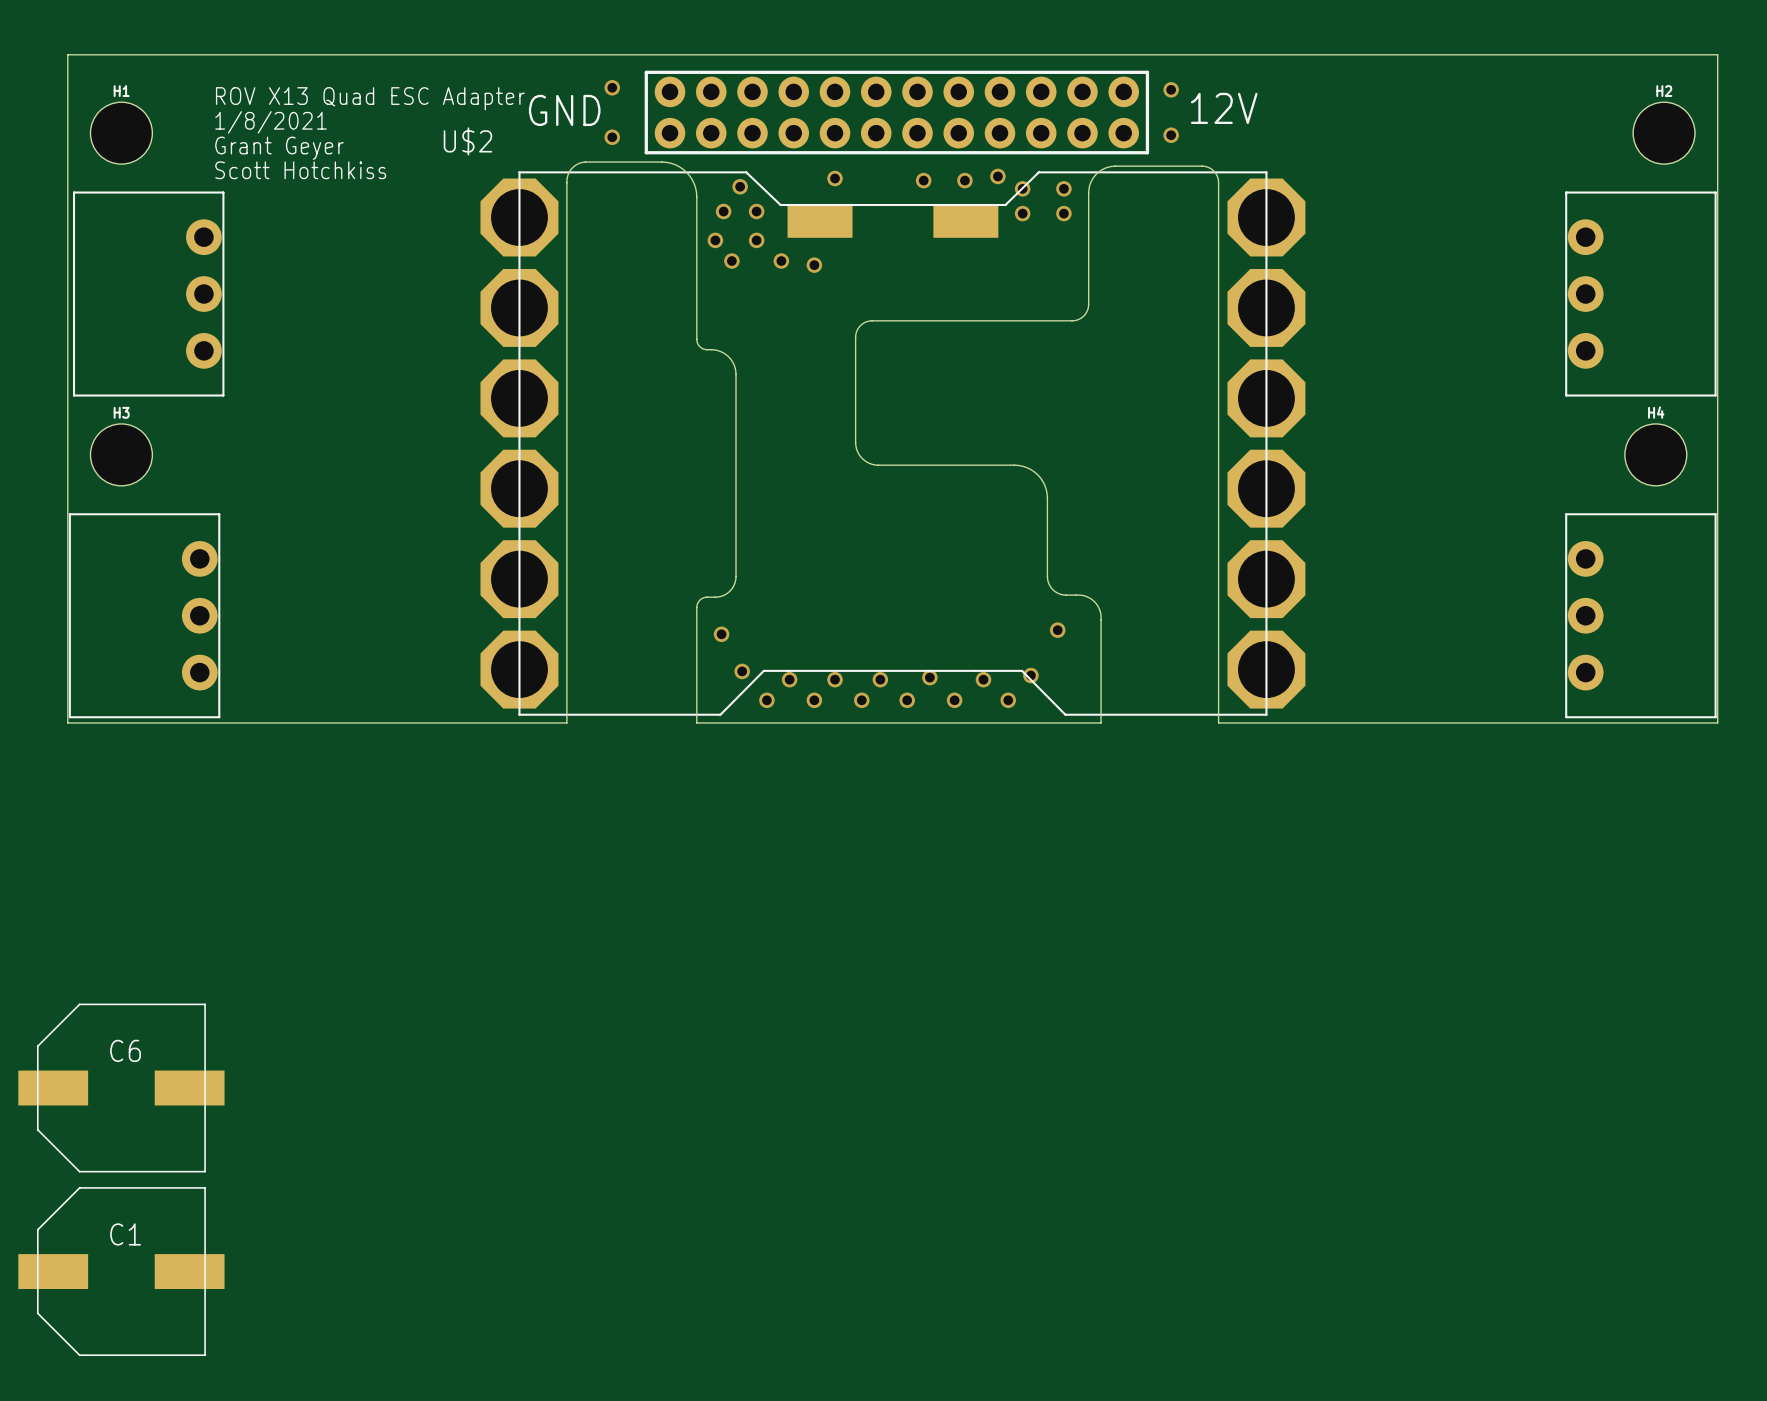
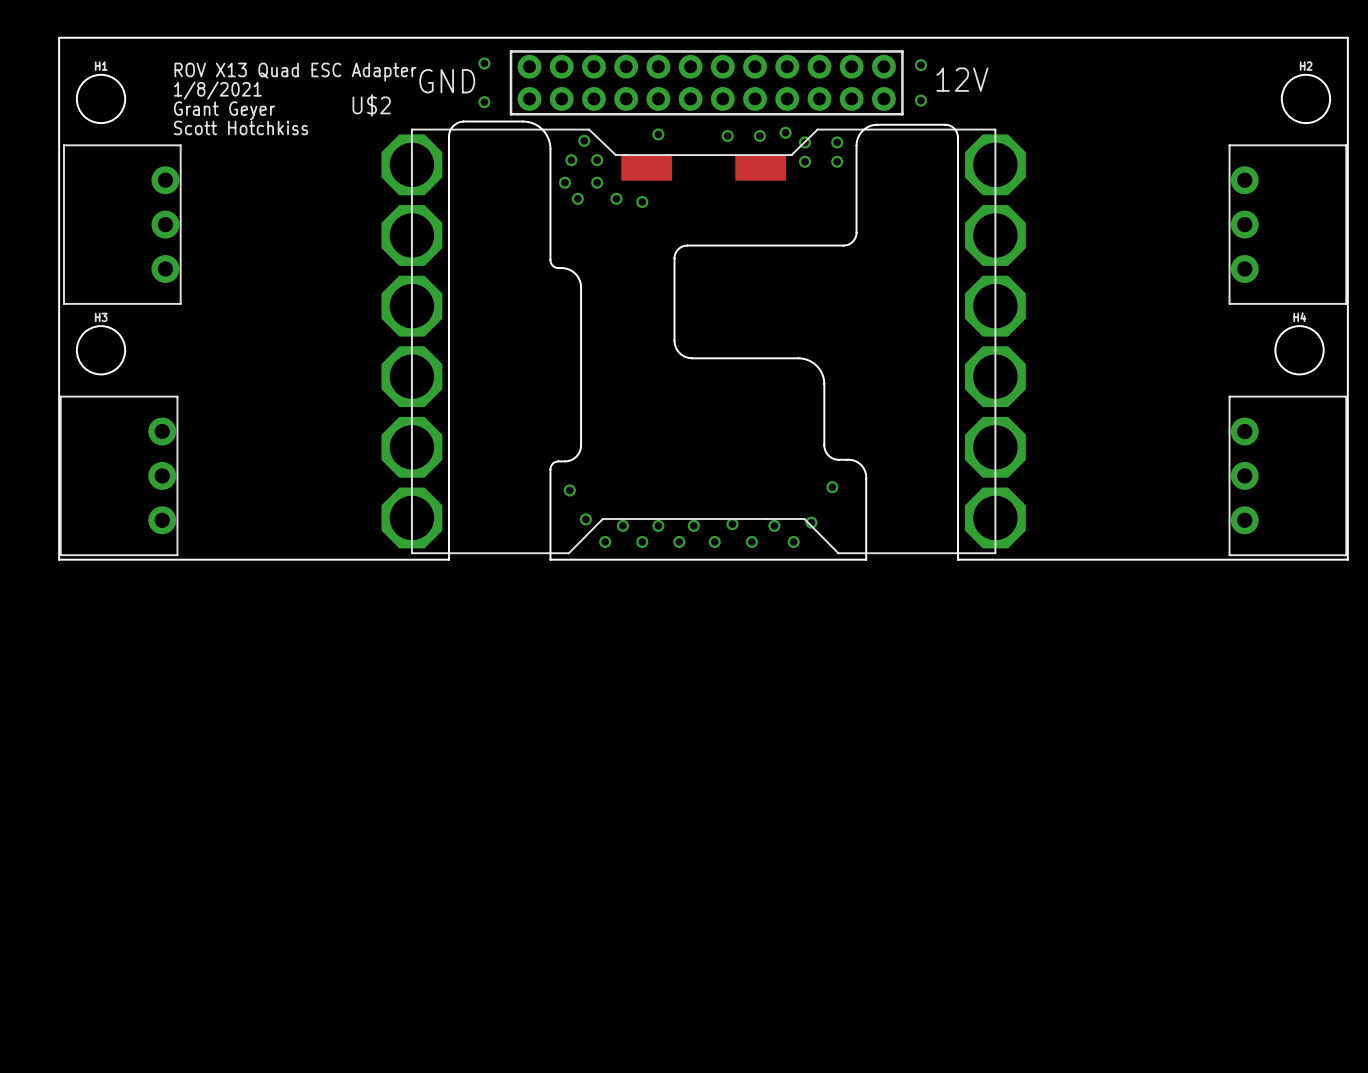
C6: (121, 1088) -> none
C1: (121, 1271) -> none

